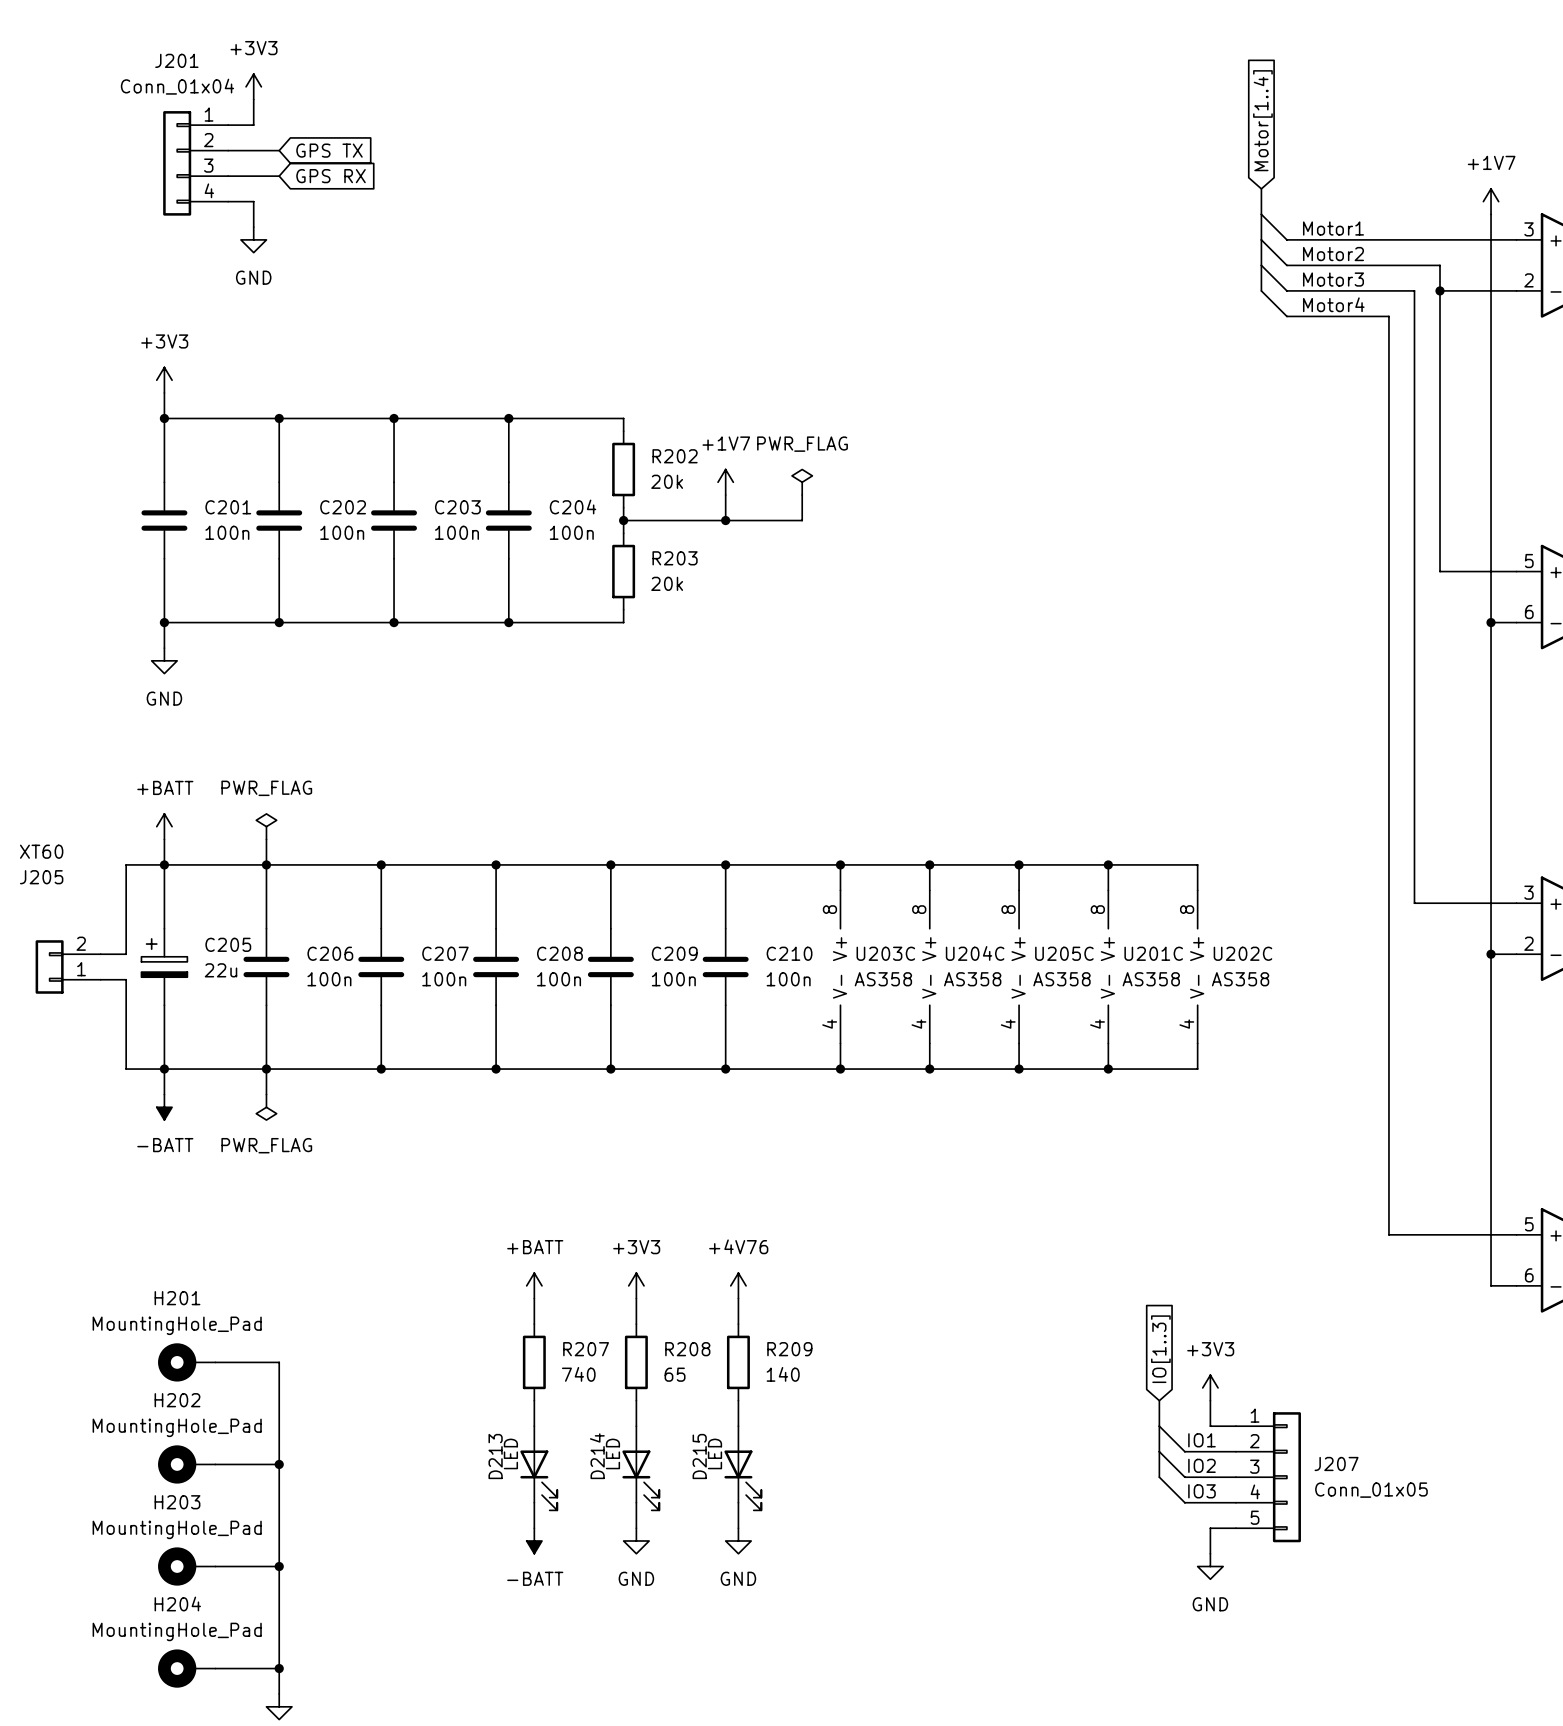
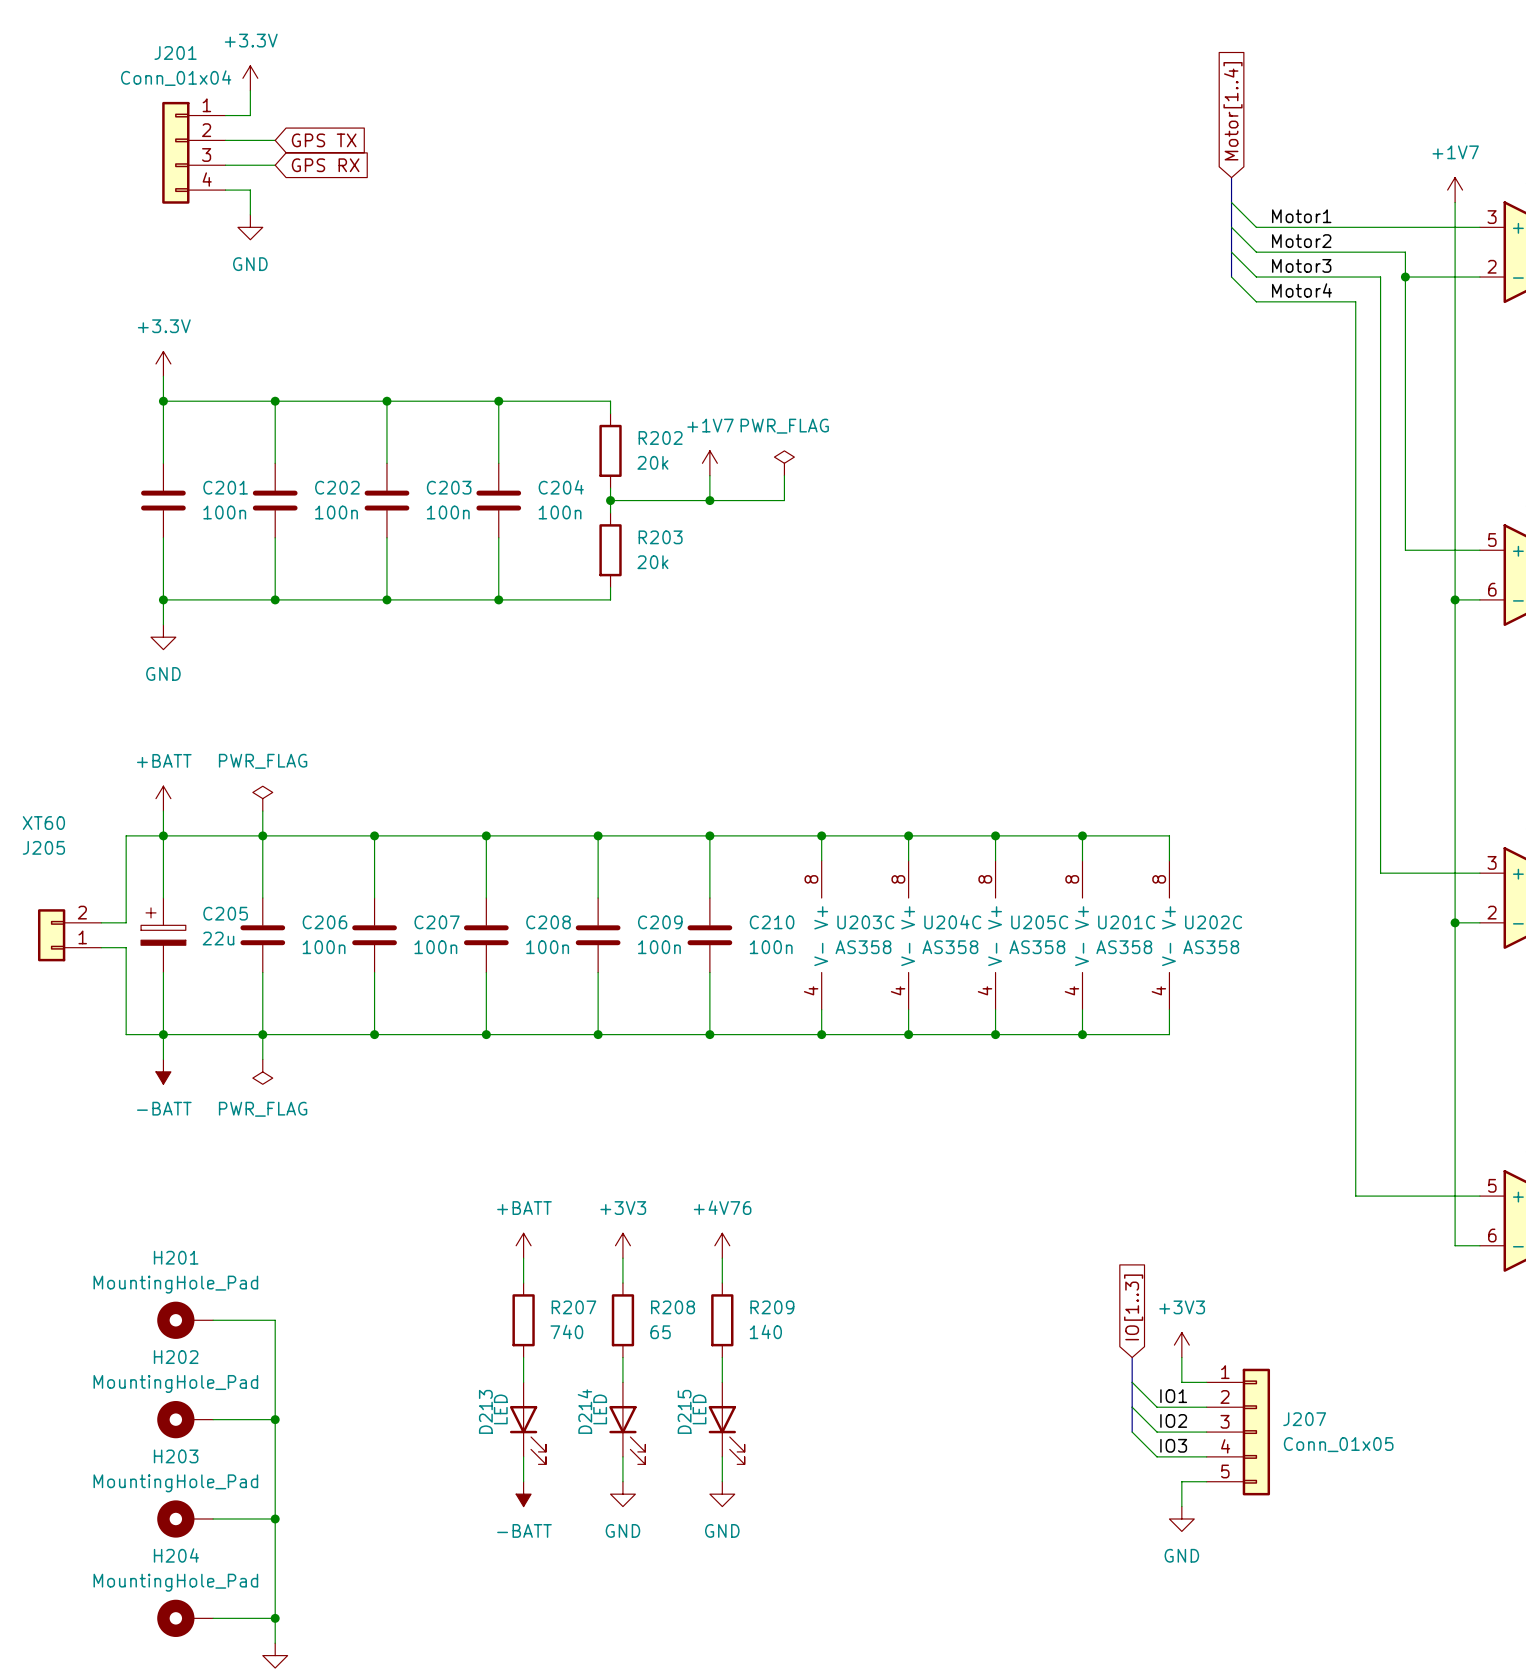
power symbol: +3V3 (253, 86) -> +3.3V (250, 78)
power symbol: +3V3 (164, 380) -> +3.3V (163, 363)

